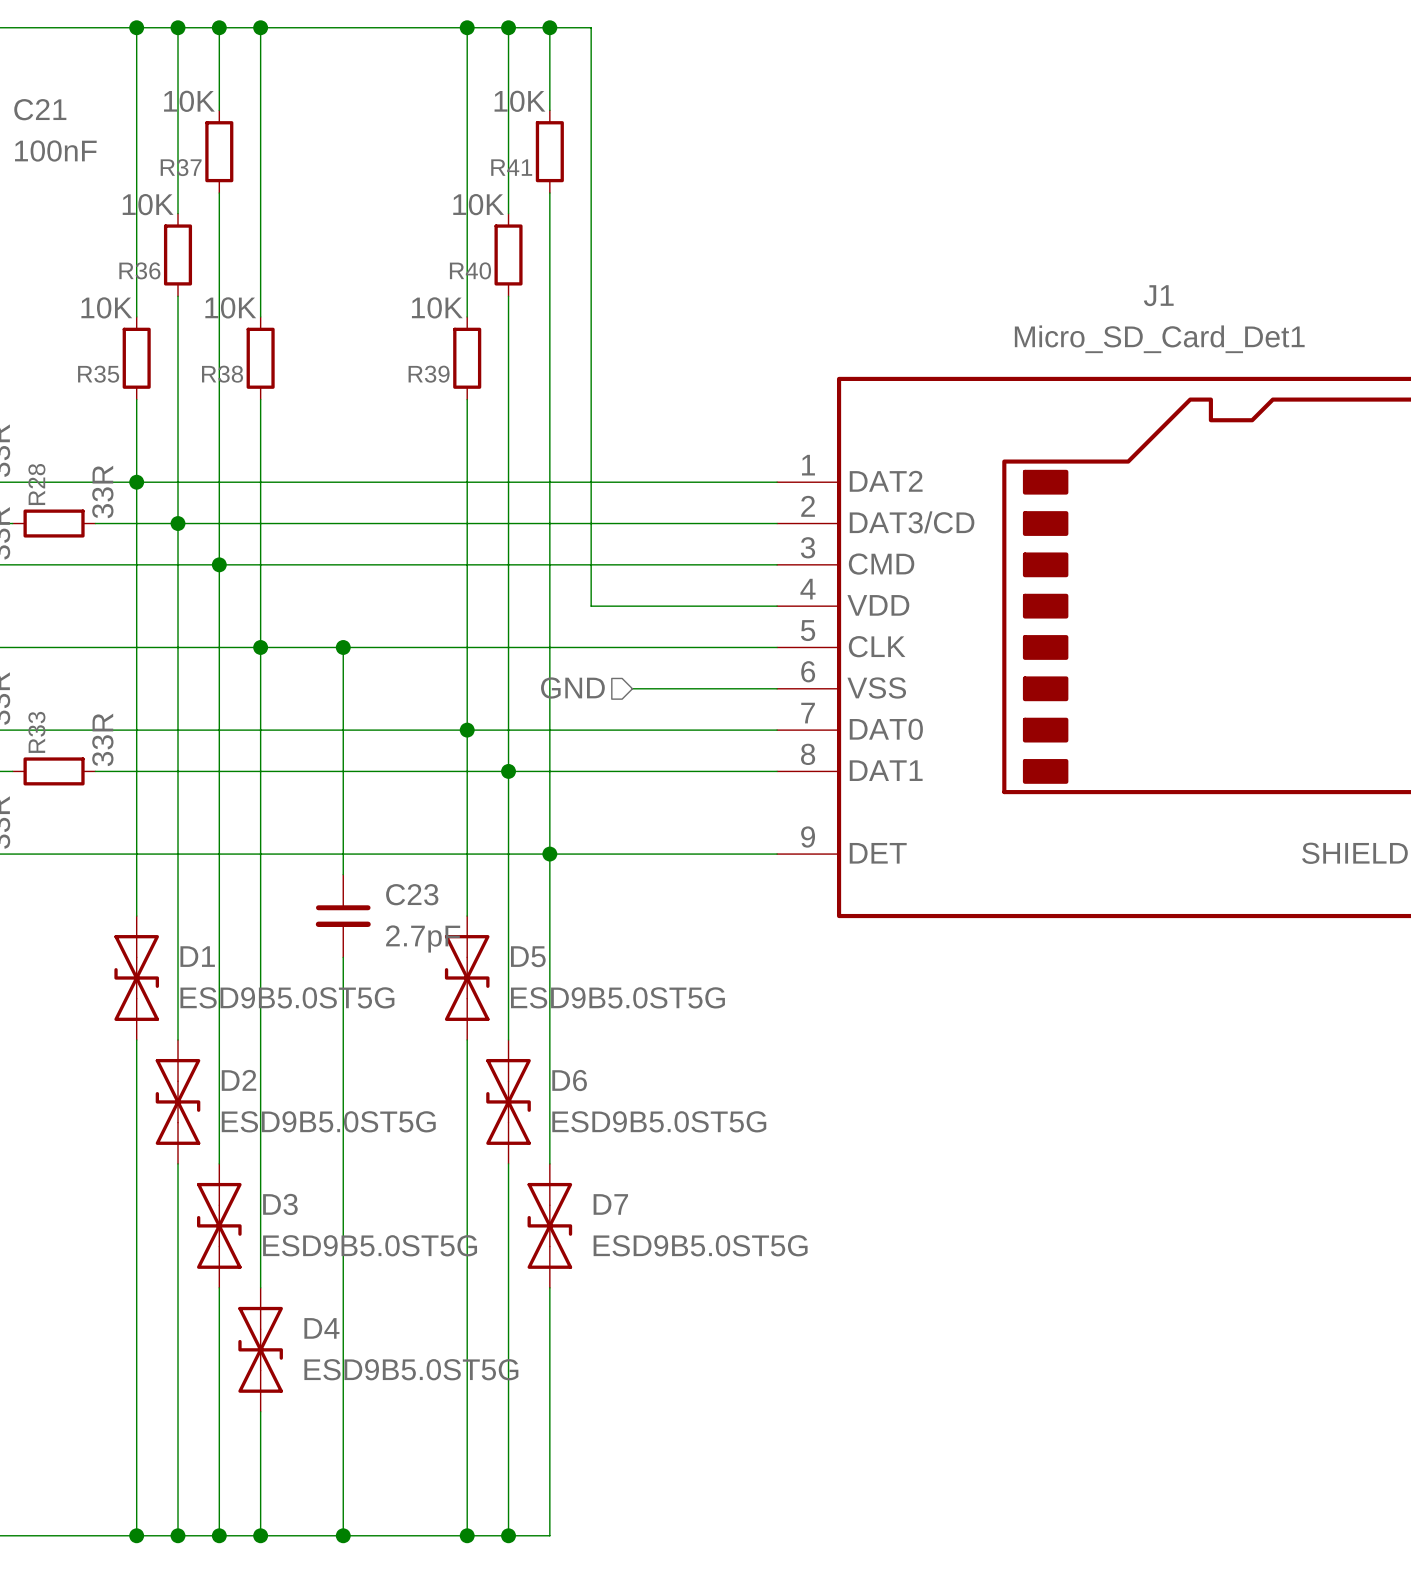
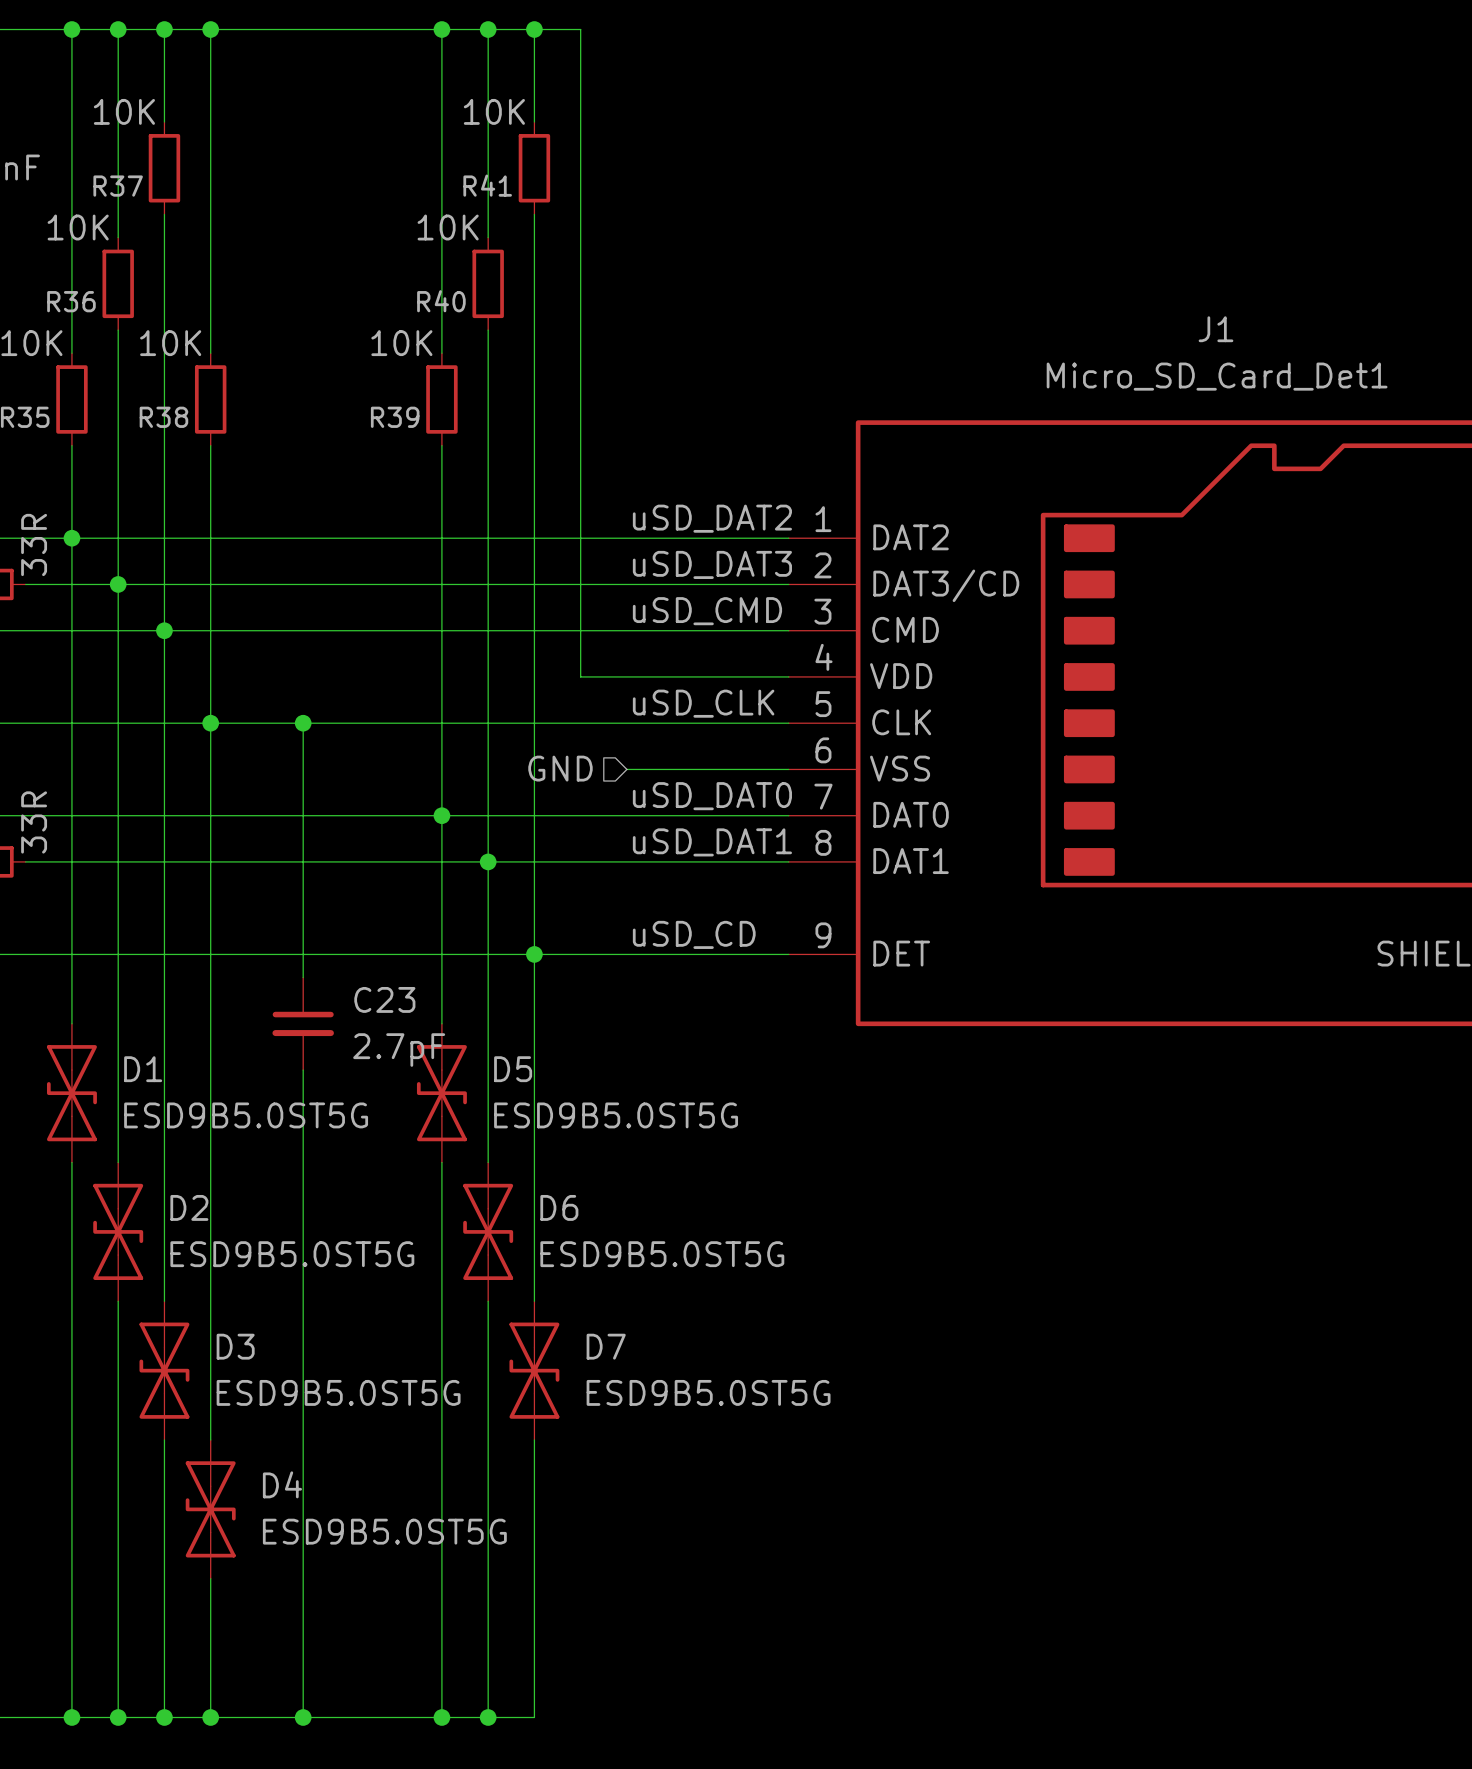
label: none -> uSD_DAT2 (712, 518)
label: none -> uSD_DAT3 (712, 564)
label: none -> uSD_CMD (707, 611)
label: none -> uSD_CLK (703, 703)
label: none -> uSD_DAT0 (712, 796)
label: none -> uSD_DAT1 (712, 842)
label: none -> uSD_CD (694, 934)

